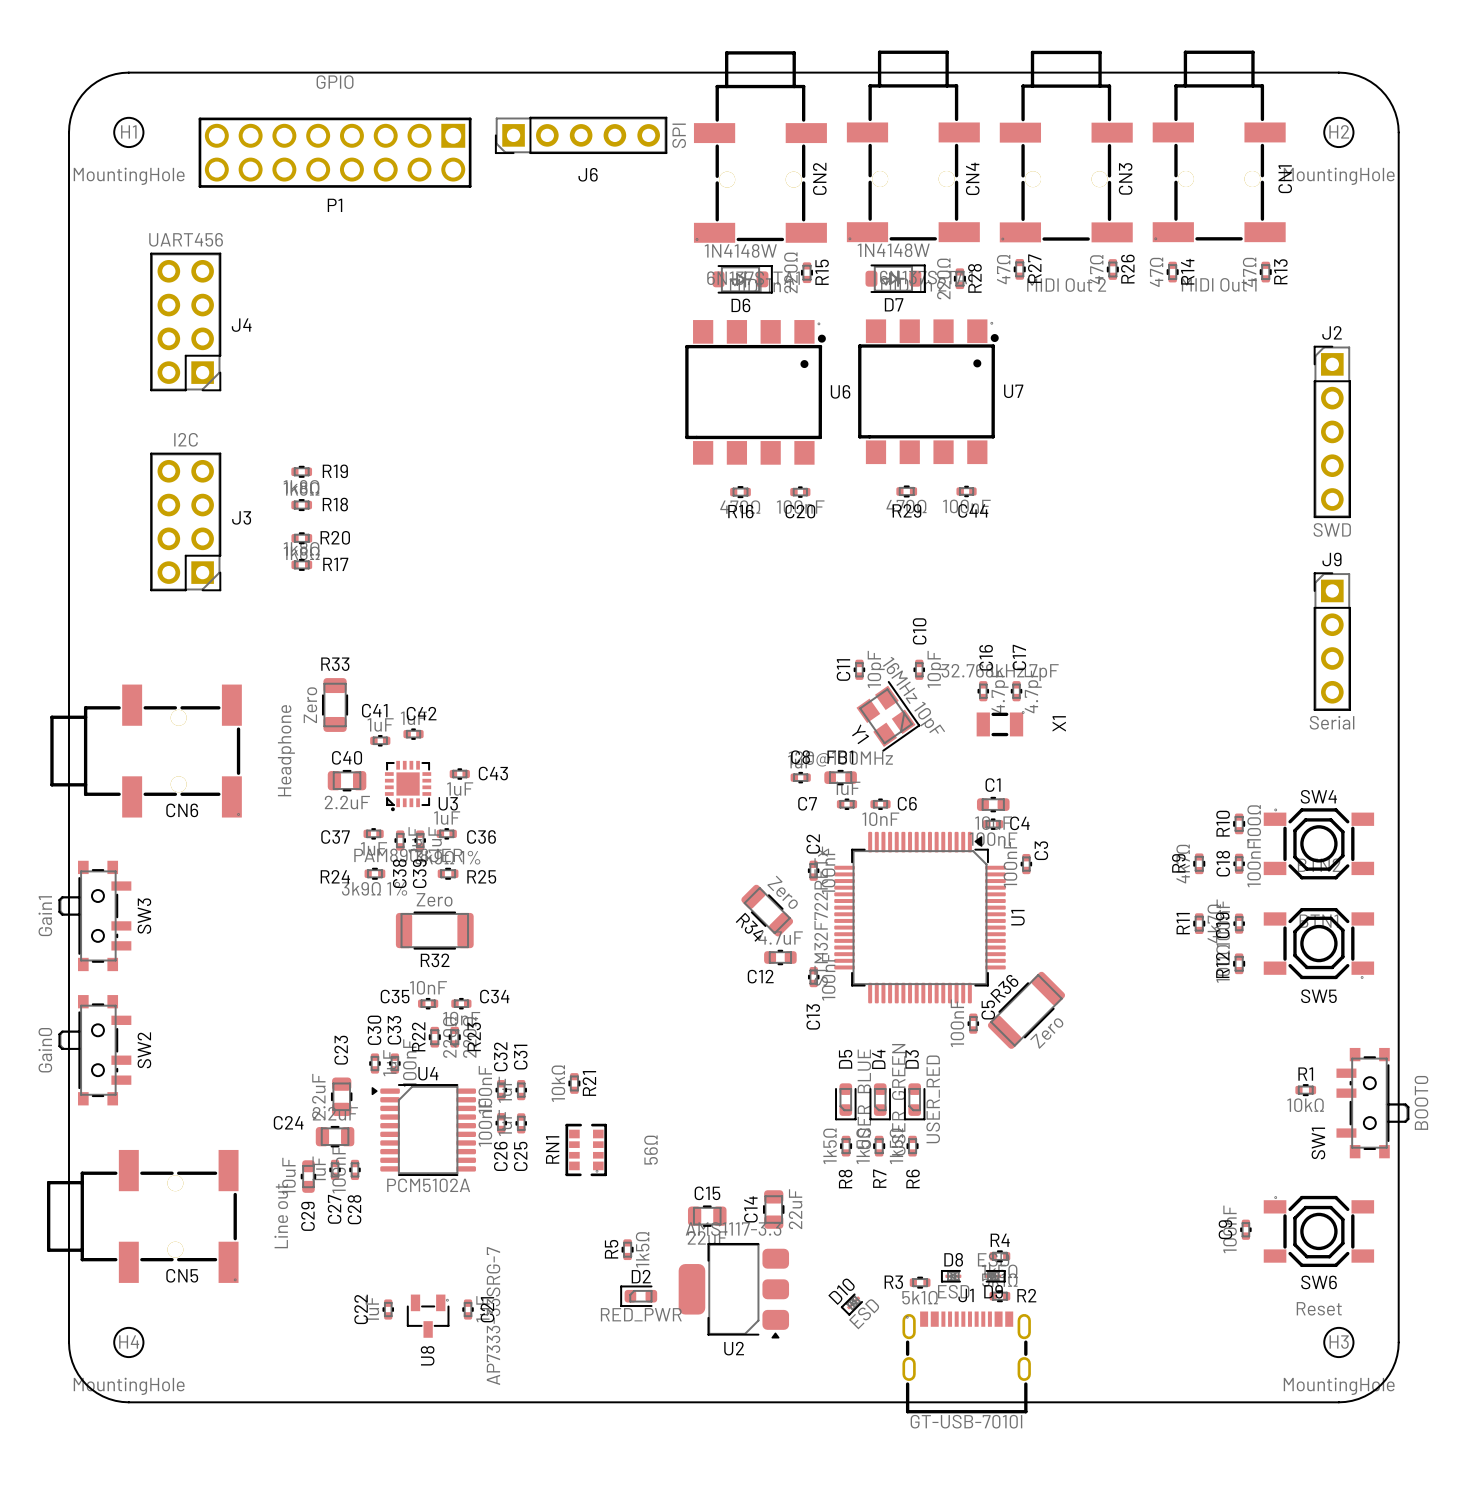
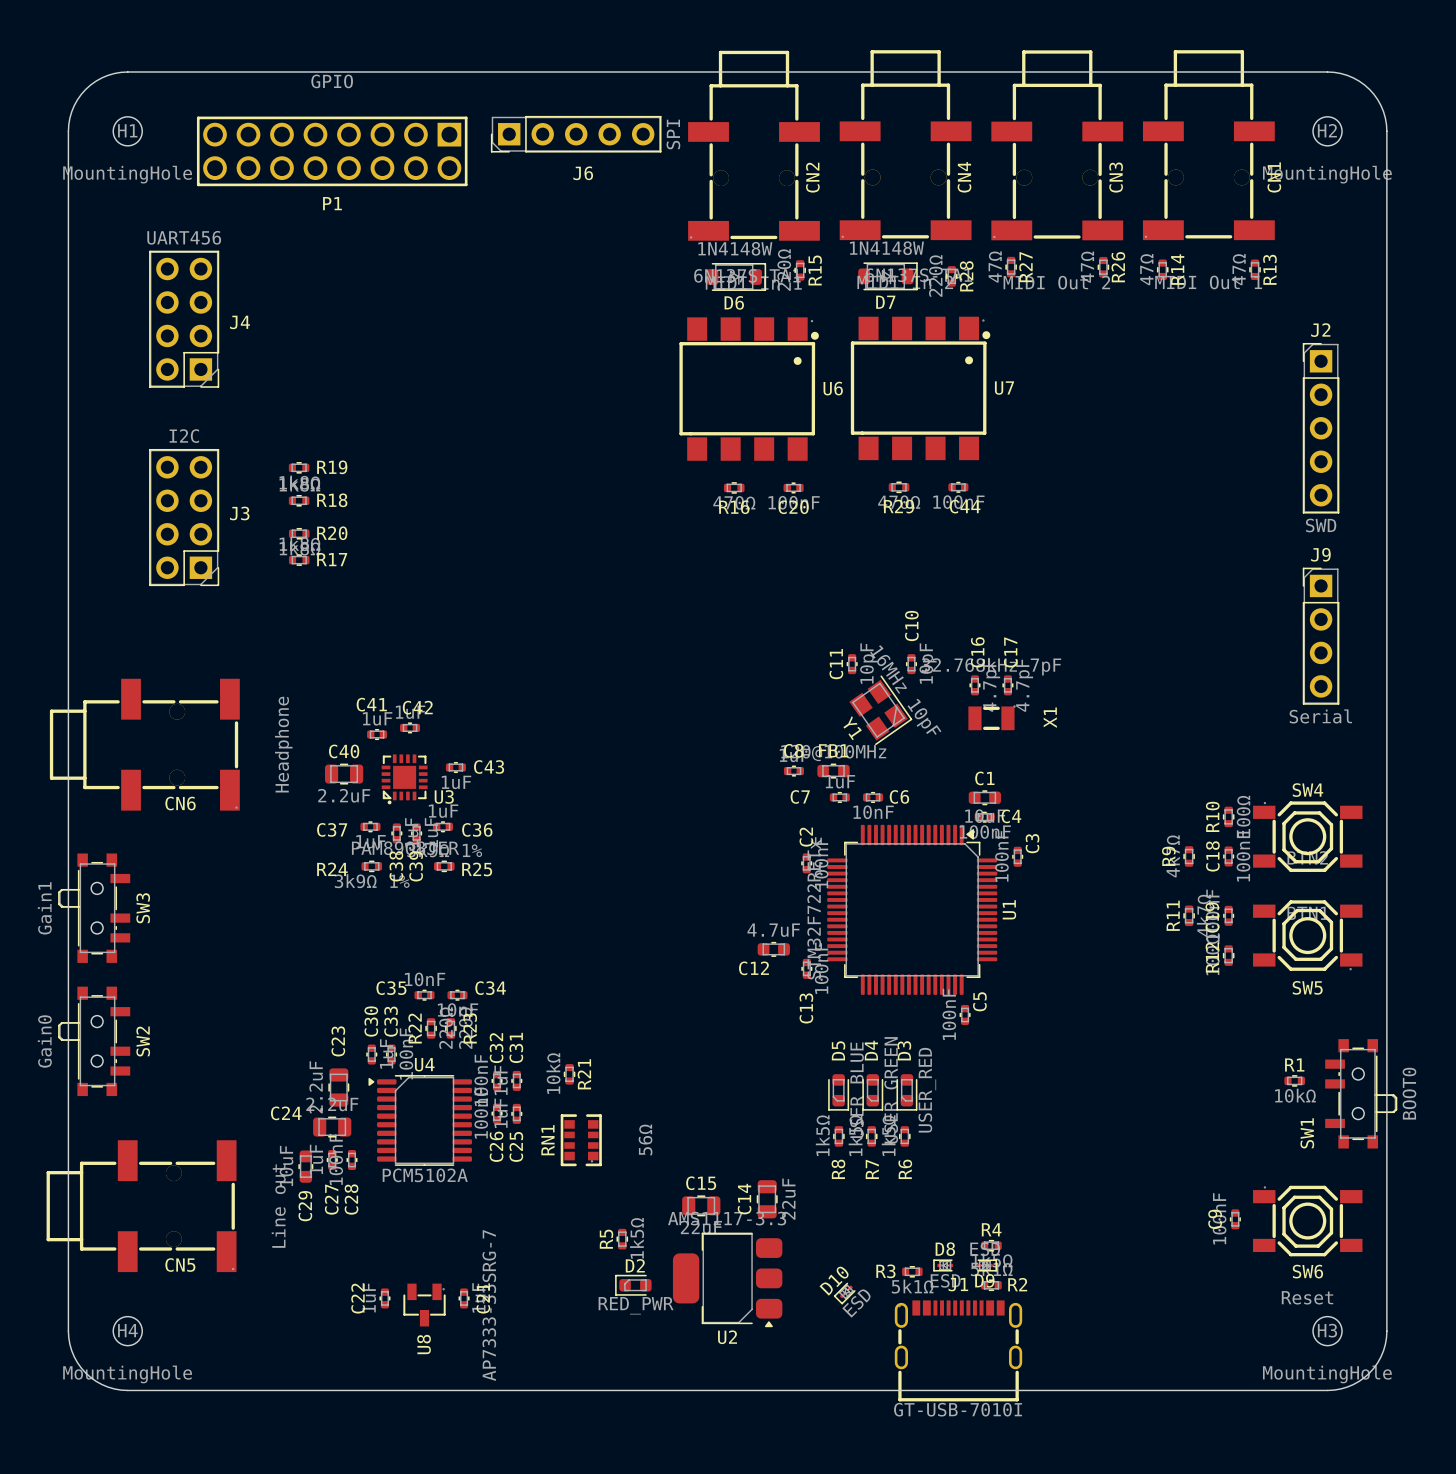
R33: Zero (335, 705) -> none
R34: Zero (767, 910) -> none
R32: Zero (434, 930) -> none
R36: Zero (1026, 1010) -> none

